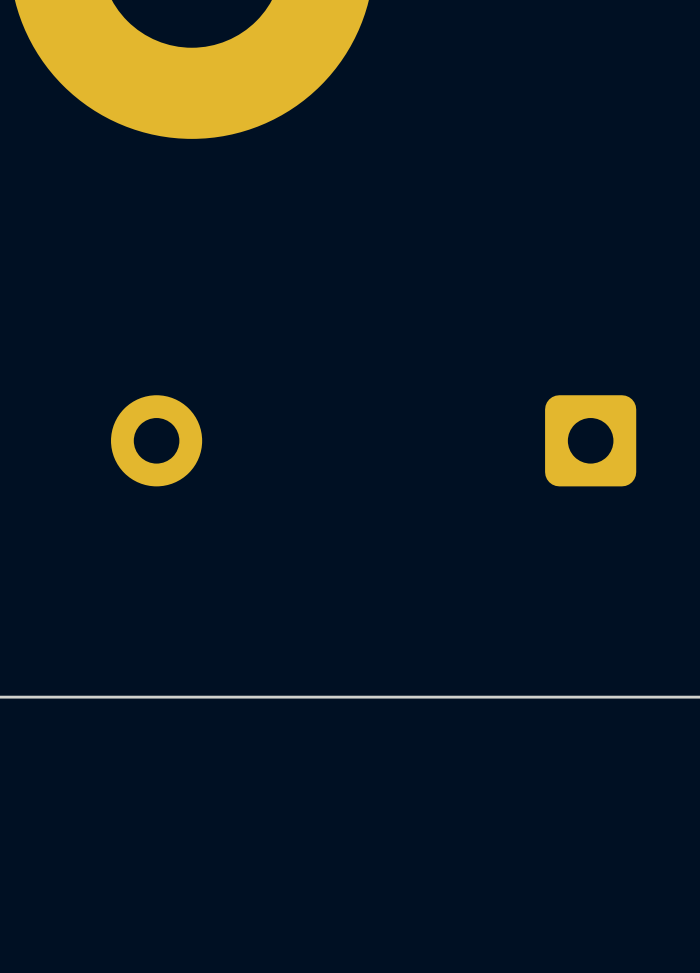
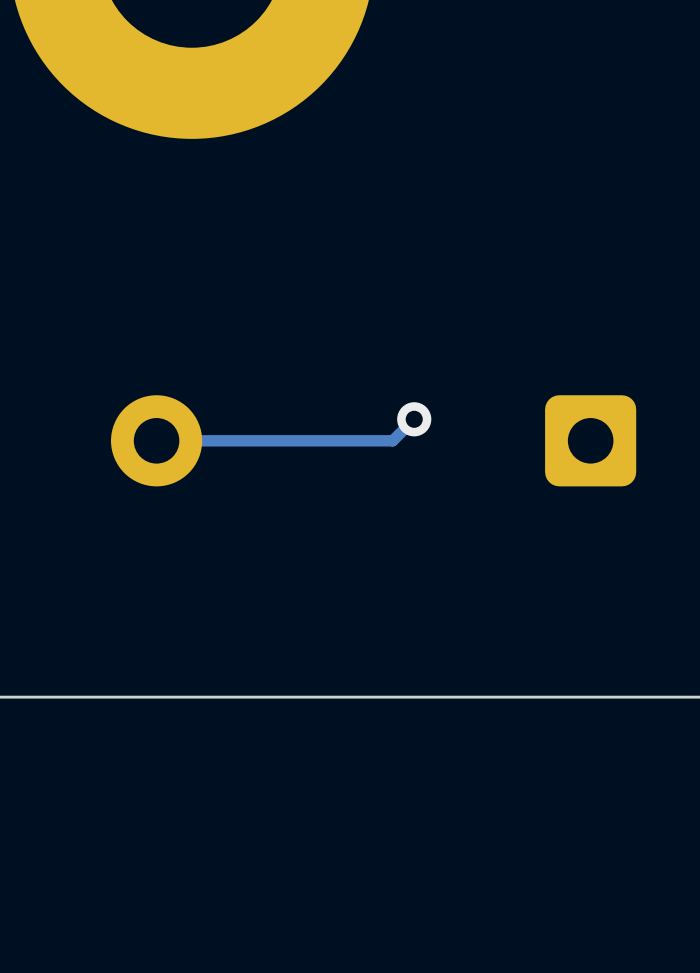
track: none -> (414, 419) (392, 440) (156, 440)
via: none -> (414, 419)

